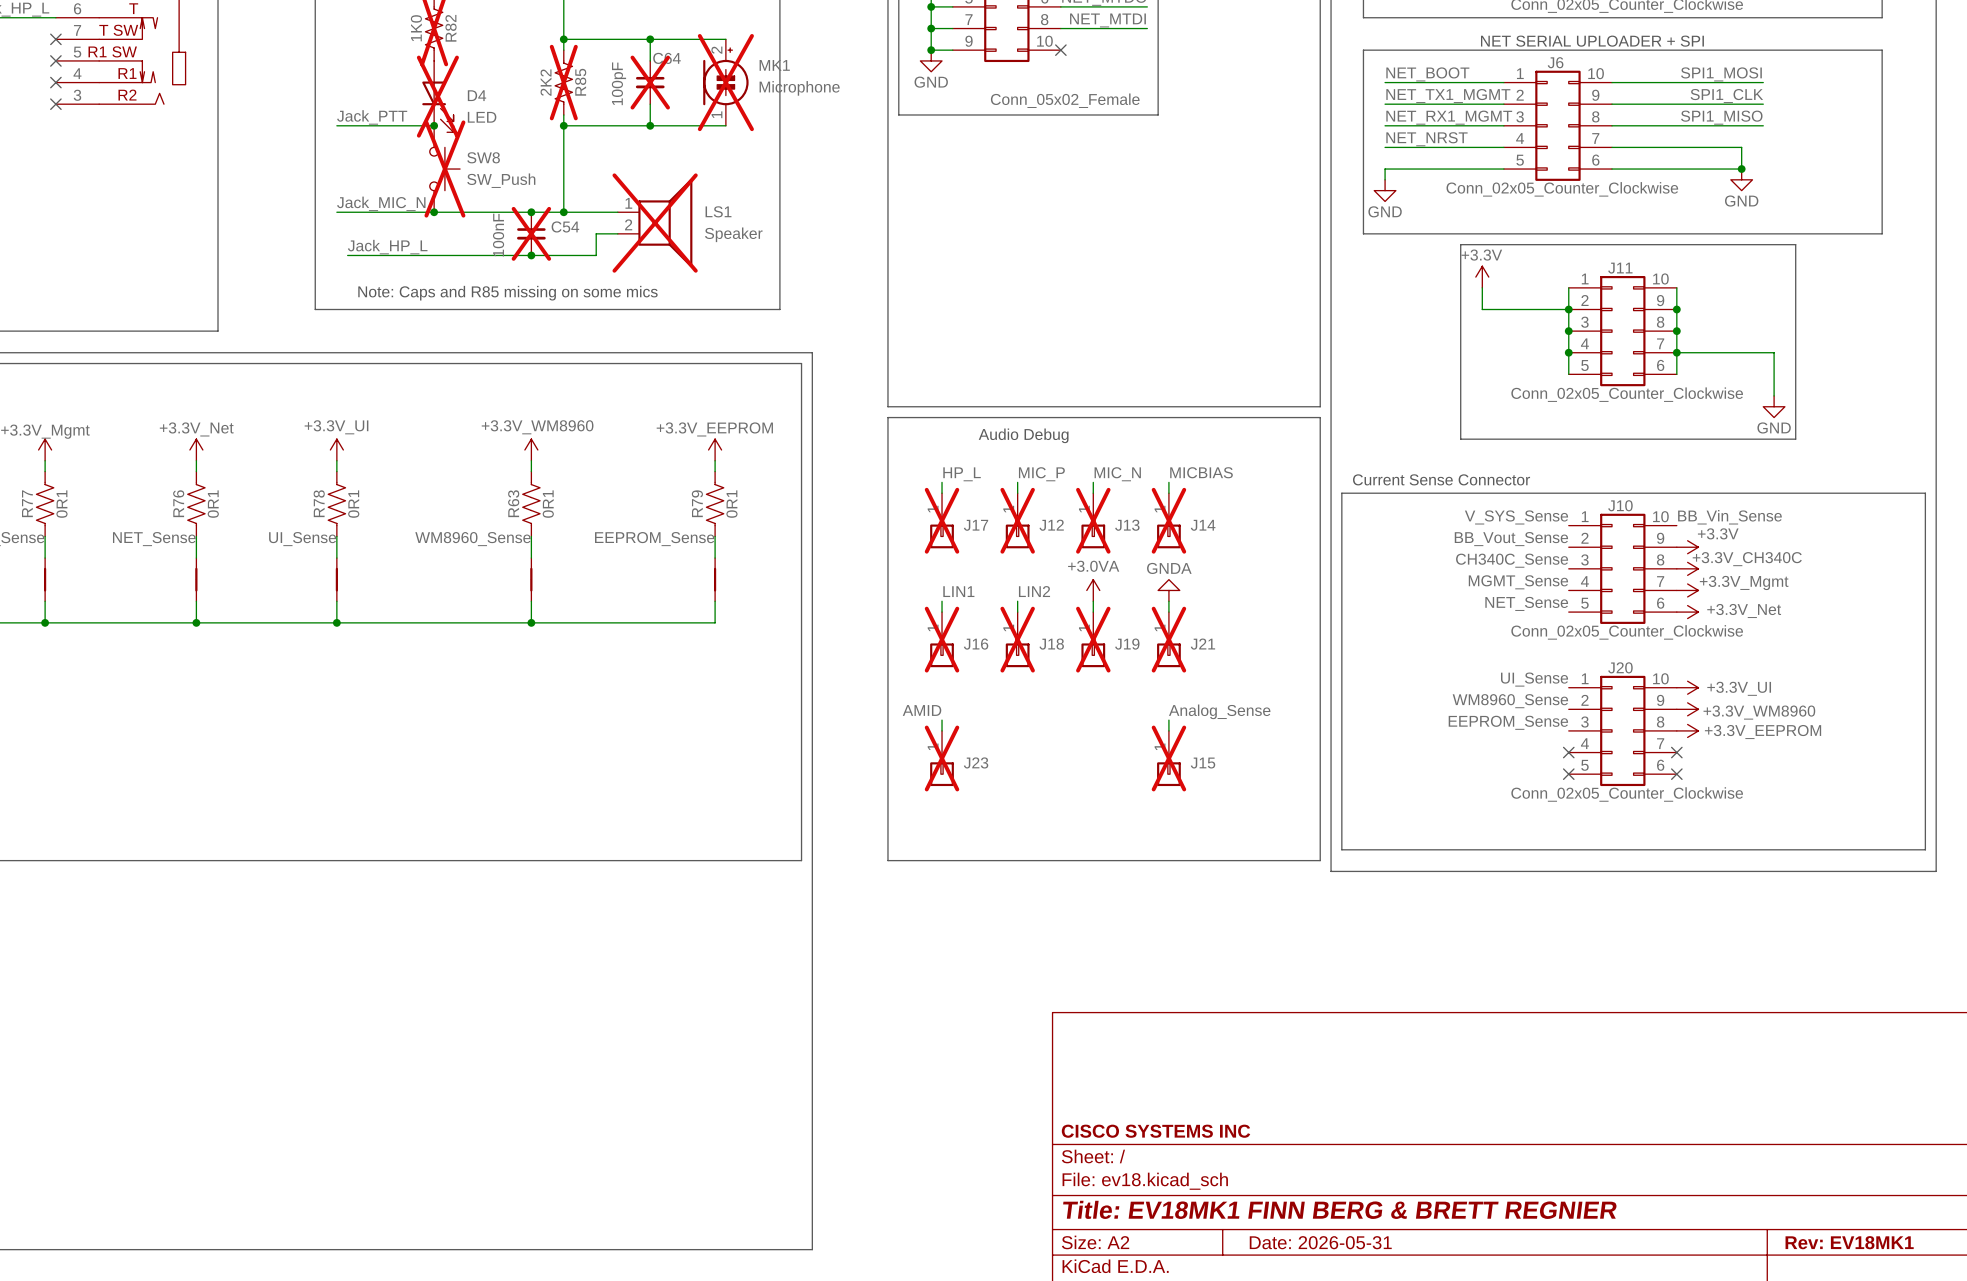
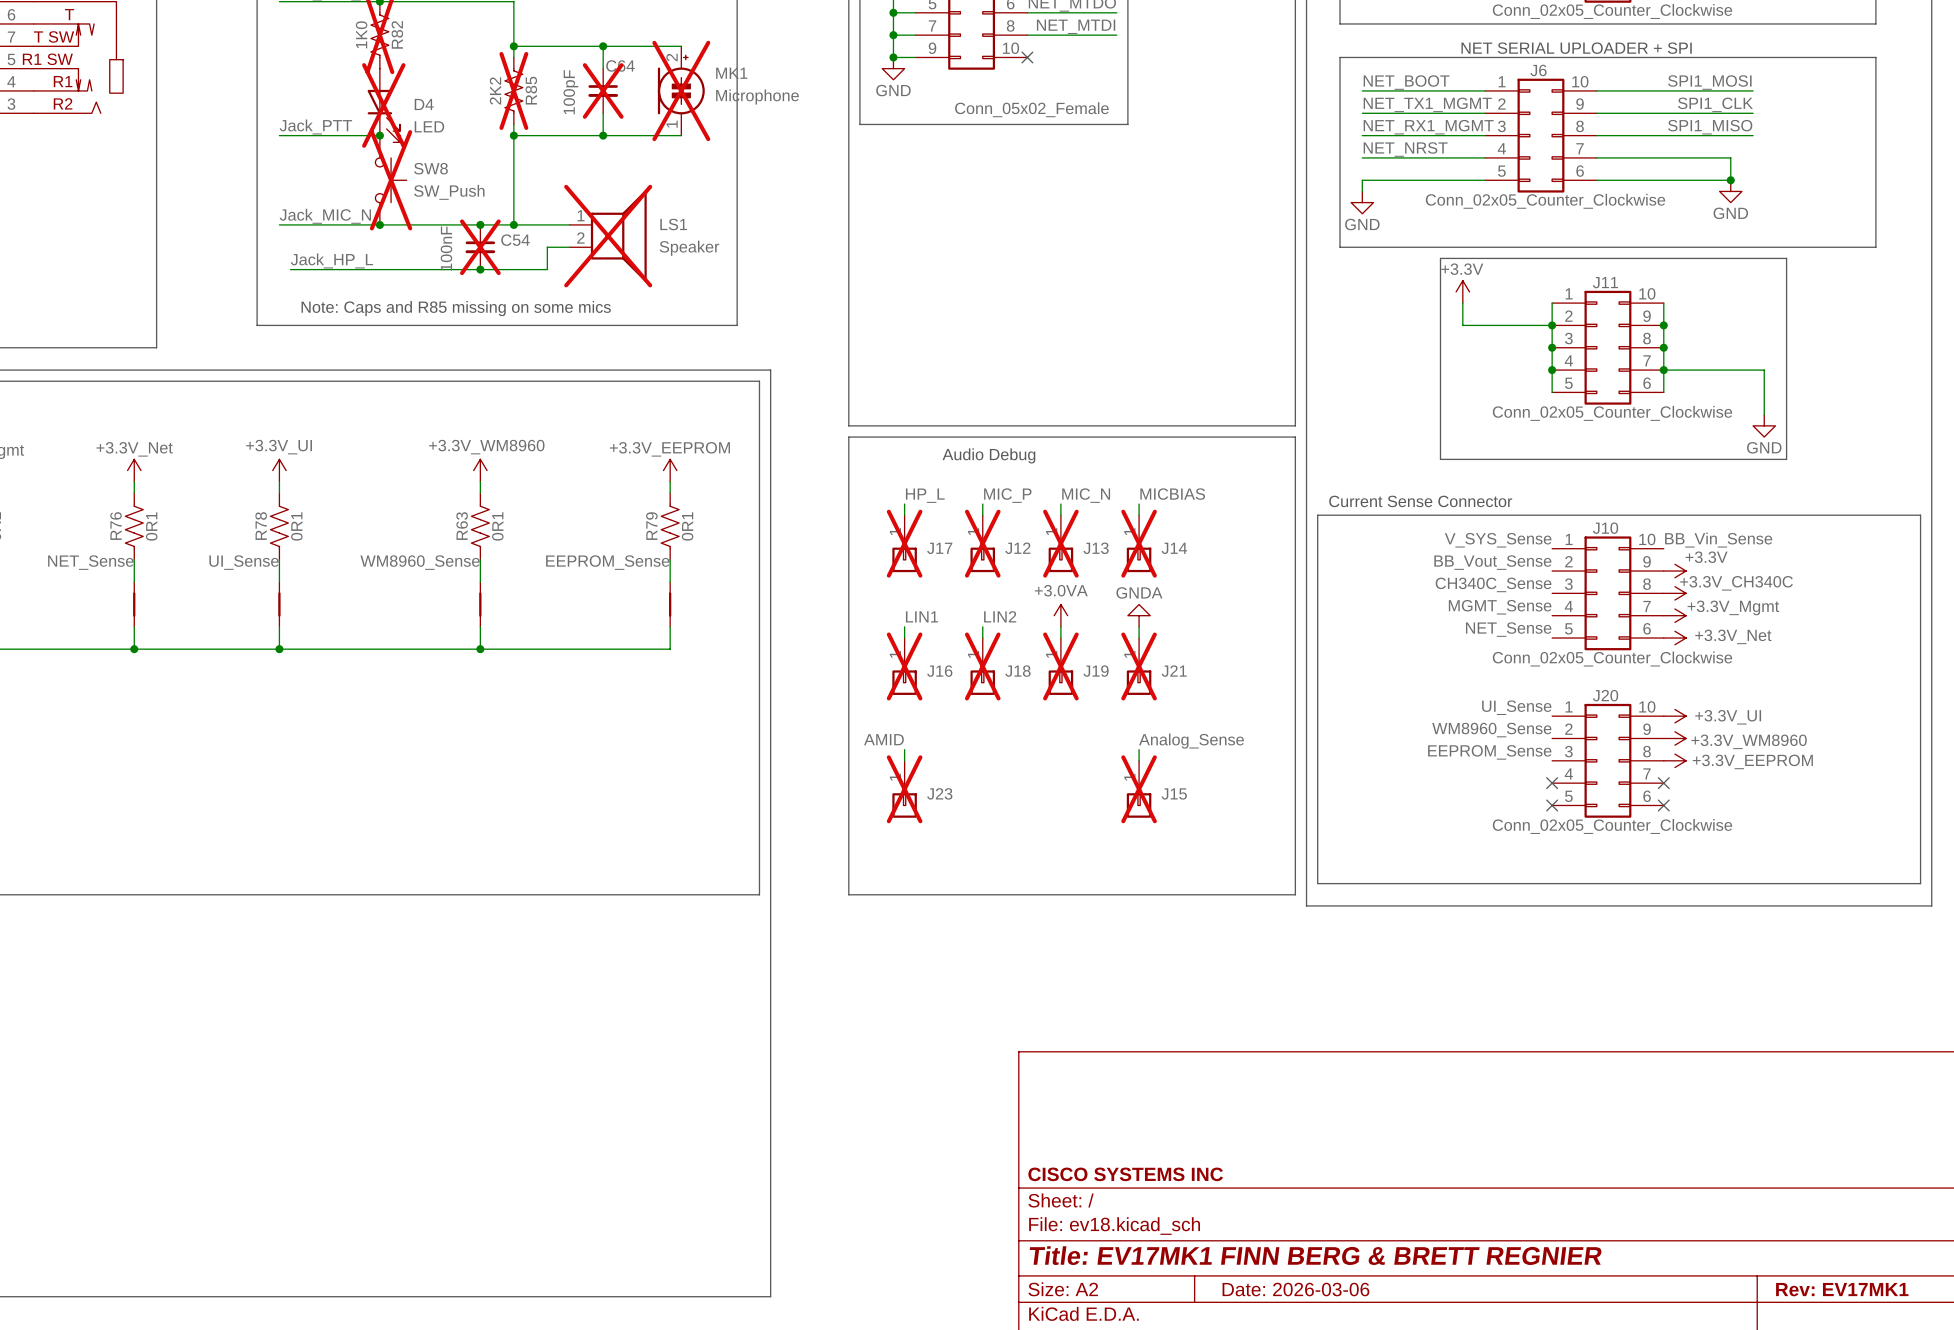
title block: Title: EV18MK1 FINN BERG & BRETT REGNIER (1339, 1209) -> Title: EV17MK1 FINN BERG & BRETT REGNIER (1315, 1255)
title block: Date: 2026-05-31 (1320, 1242) -> Date: 2026-03-06 (1295, 1289)
title block: Rev: EV18MK1 (1849, 1242) -> Rev: EV17MK1 (1842, 1289)

